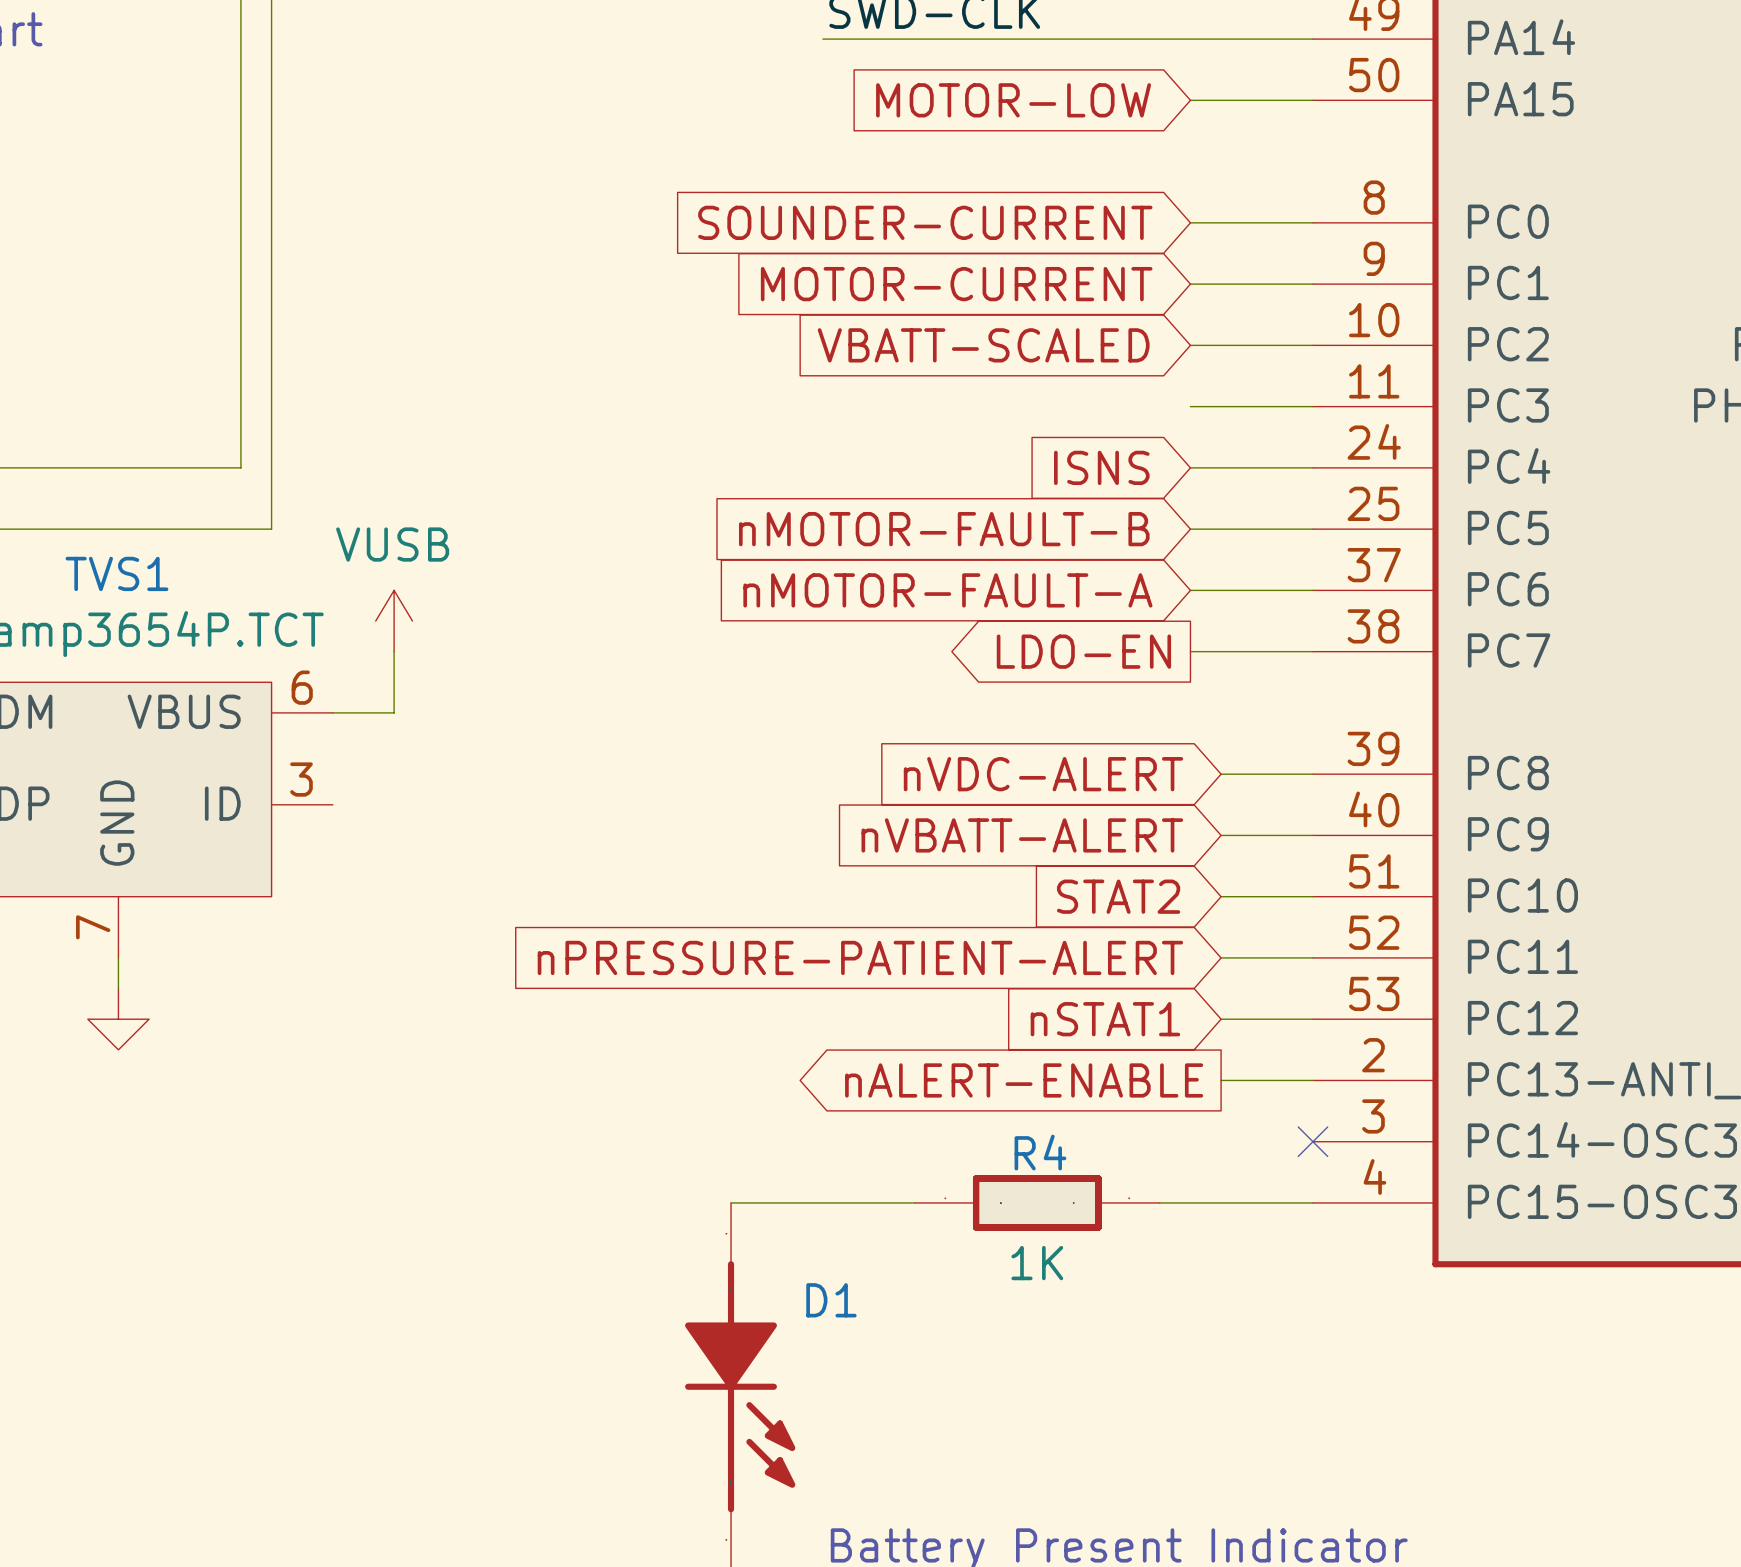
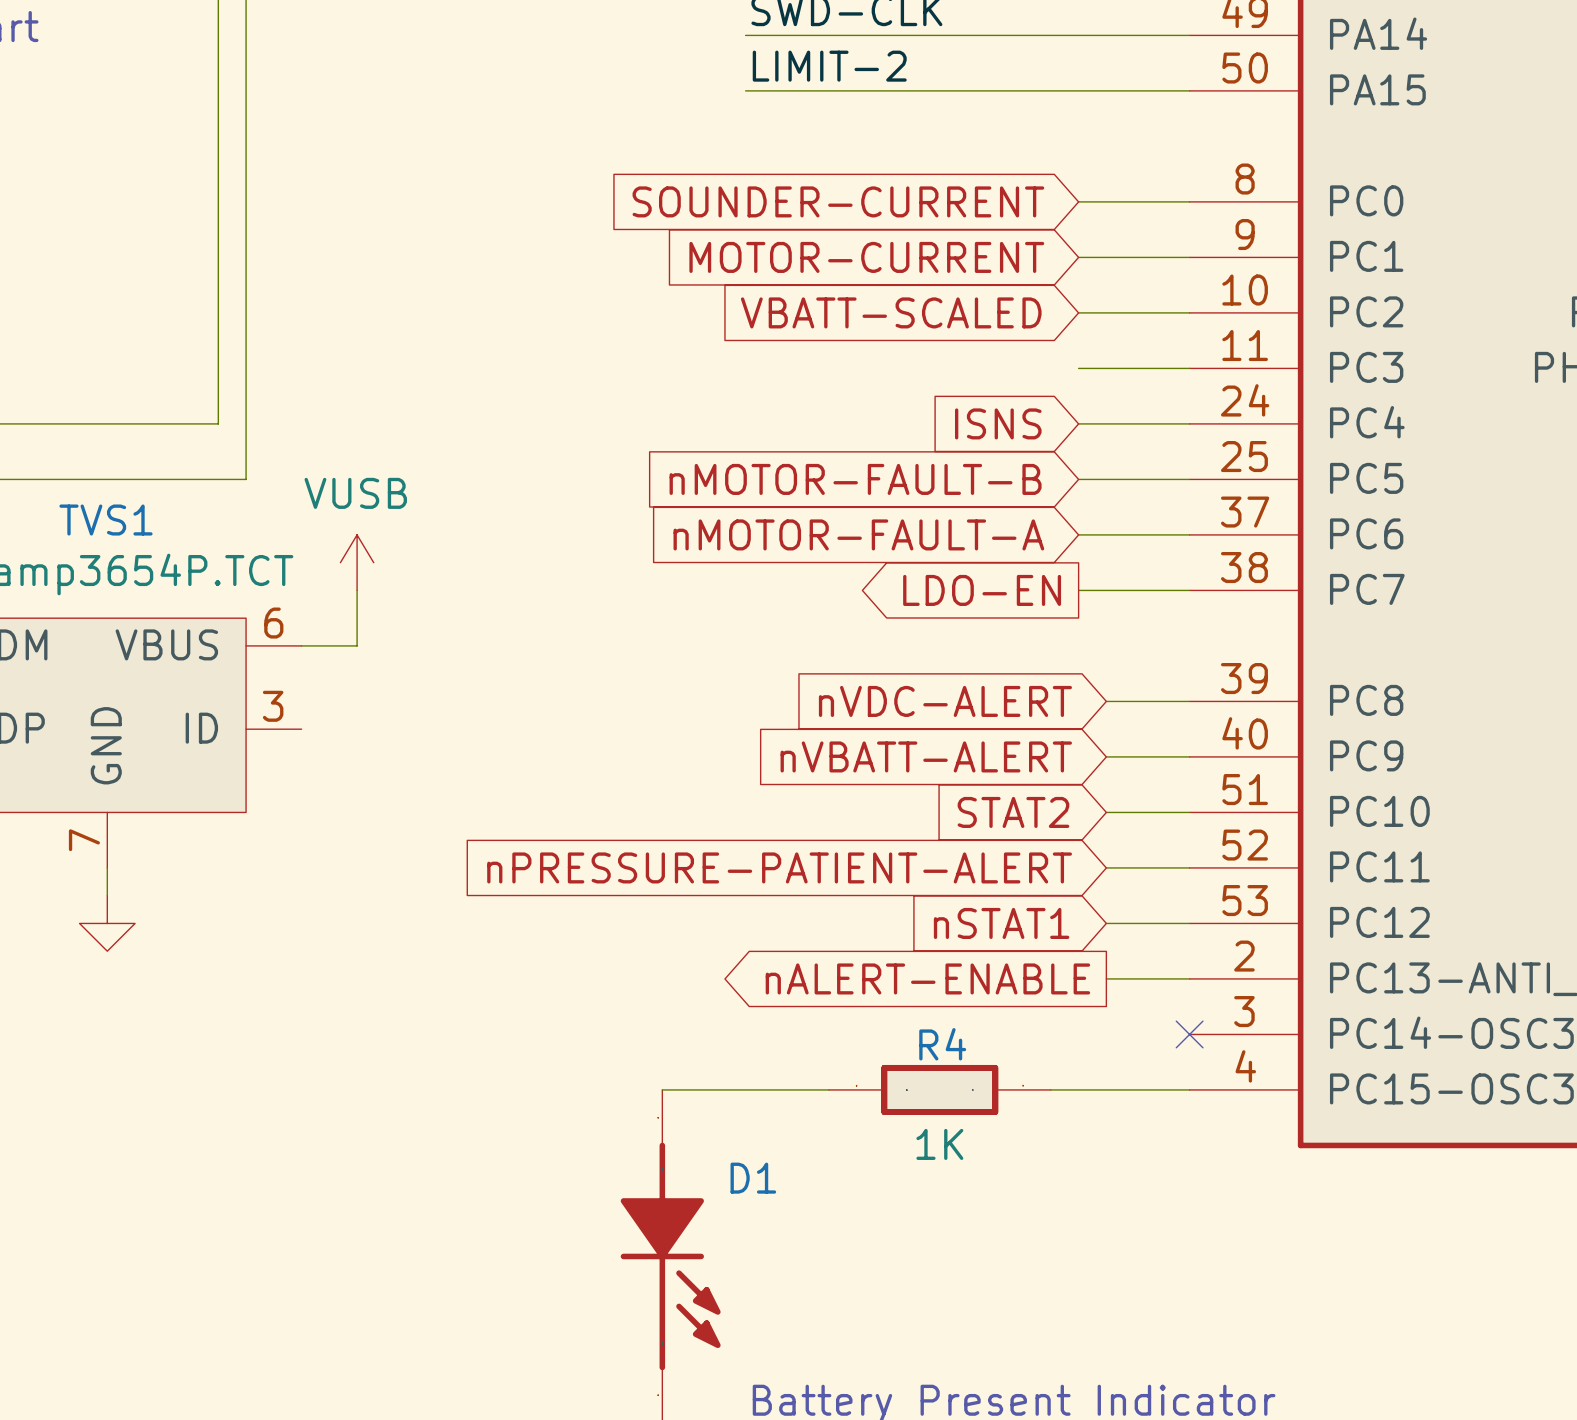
label: none -> LIMIT-2 (829, 66)
wire: none -> (745, 90) (1078, 90)
global label: MOTOR-LOW (1013, 100) -> none

